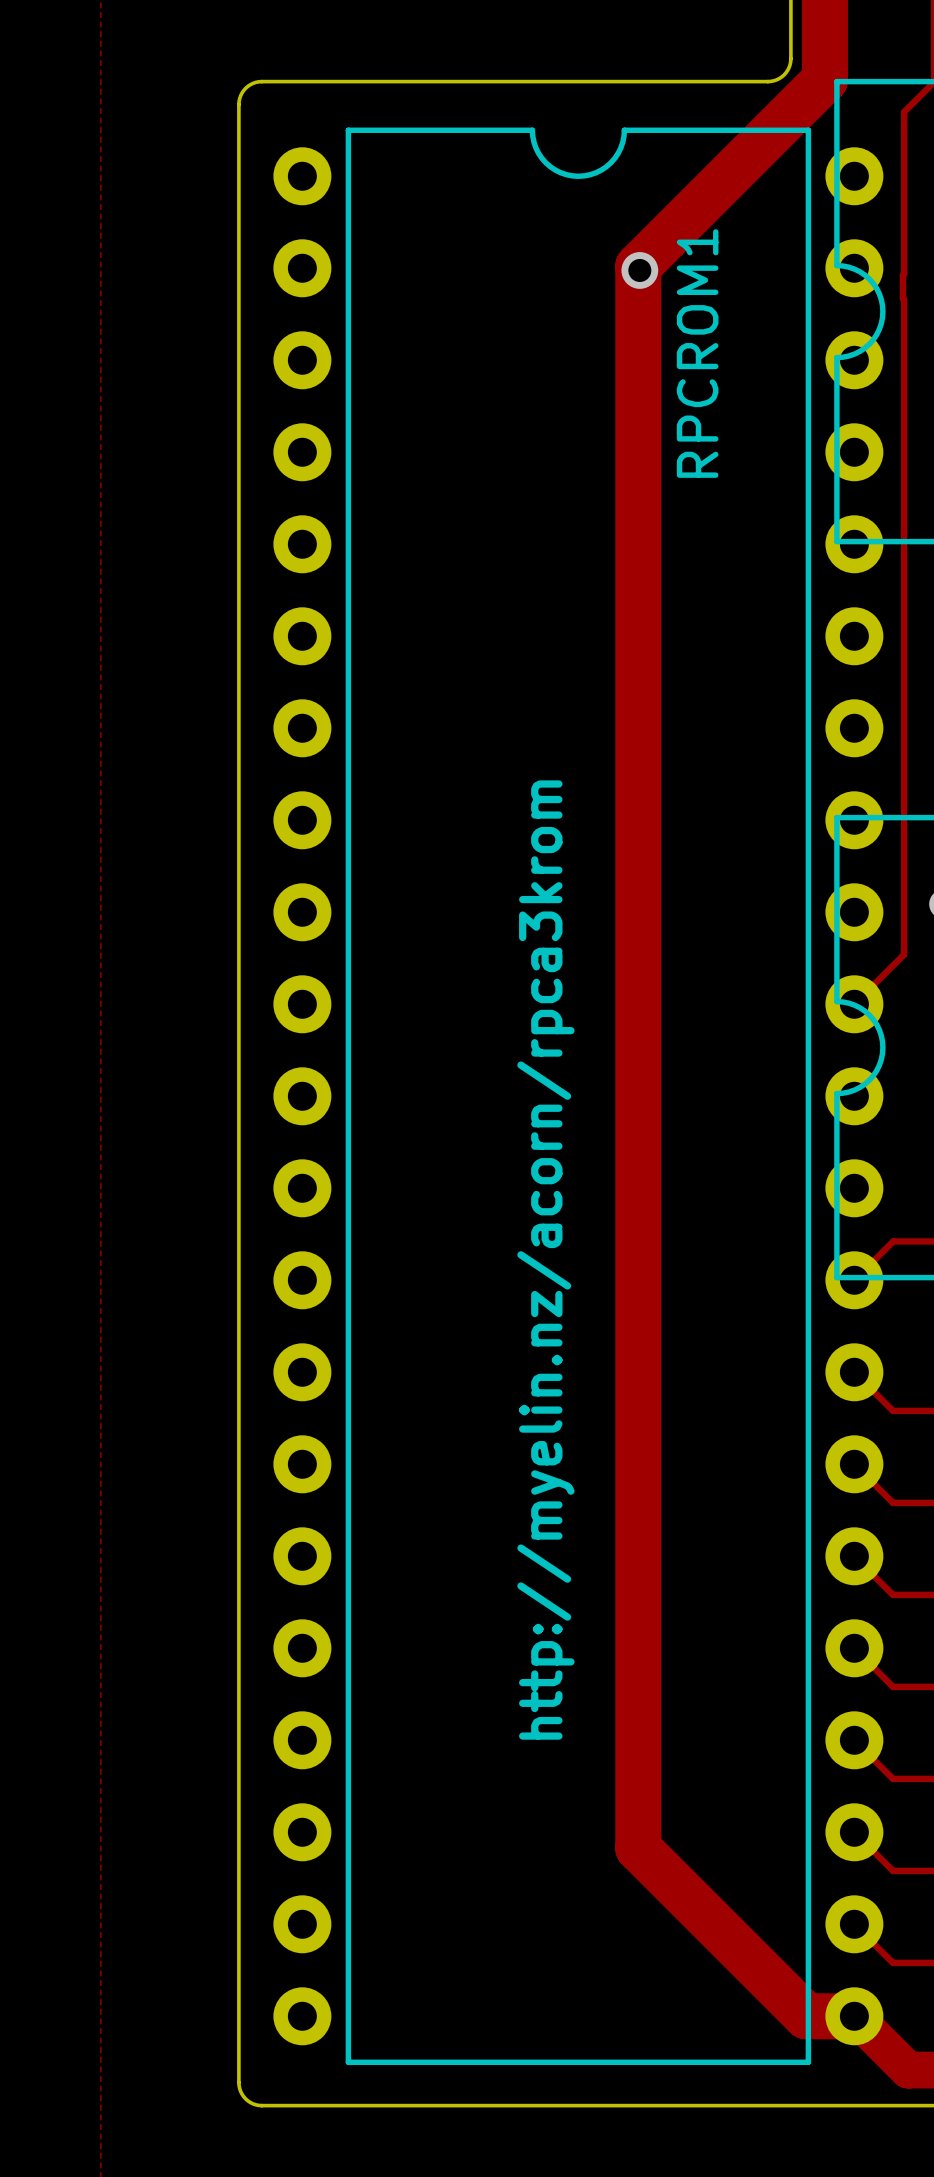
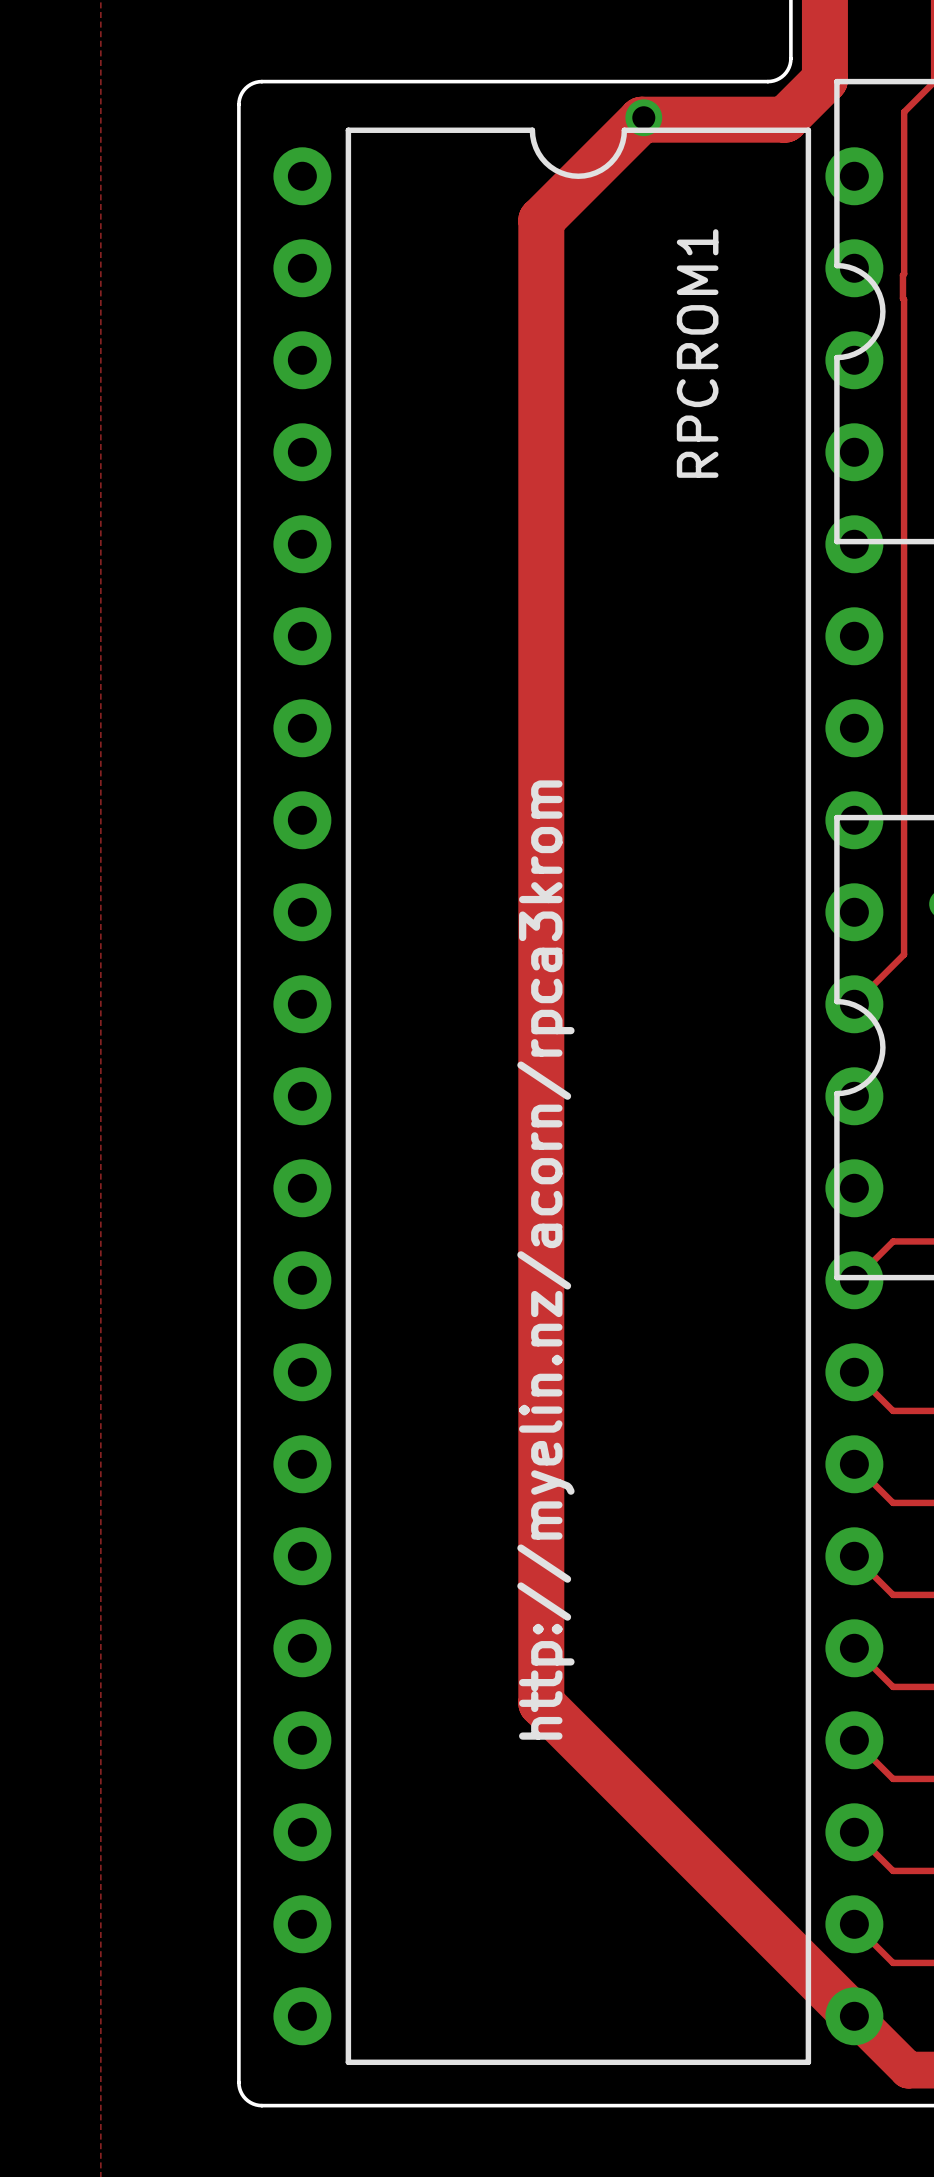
track: (784, 119) (638, 266) (638, 1848) (806, 2016) (854, 2016) -> (784, 119) (641, 119) (541, 220) (541, 1703) (854, 2016)
via position: (639, 270) -> (643, 117)

